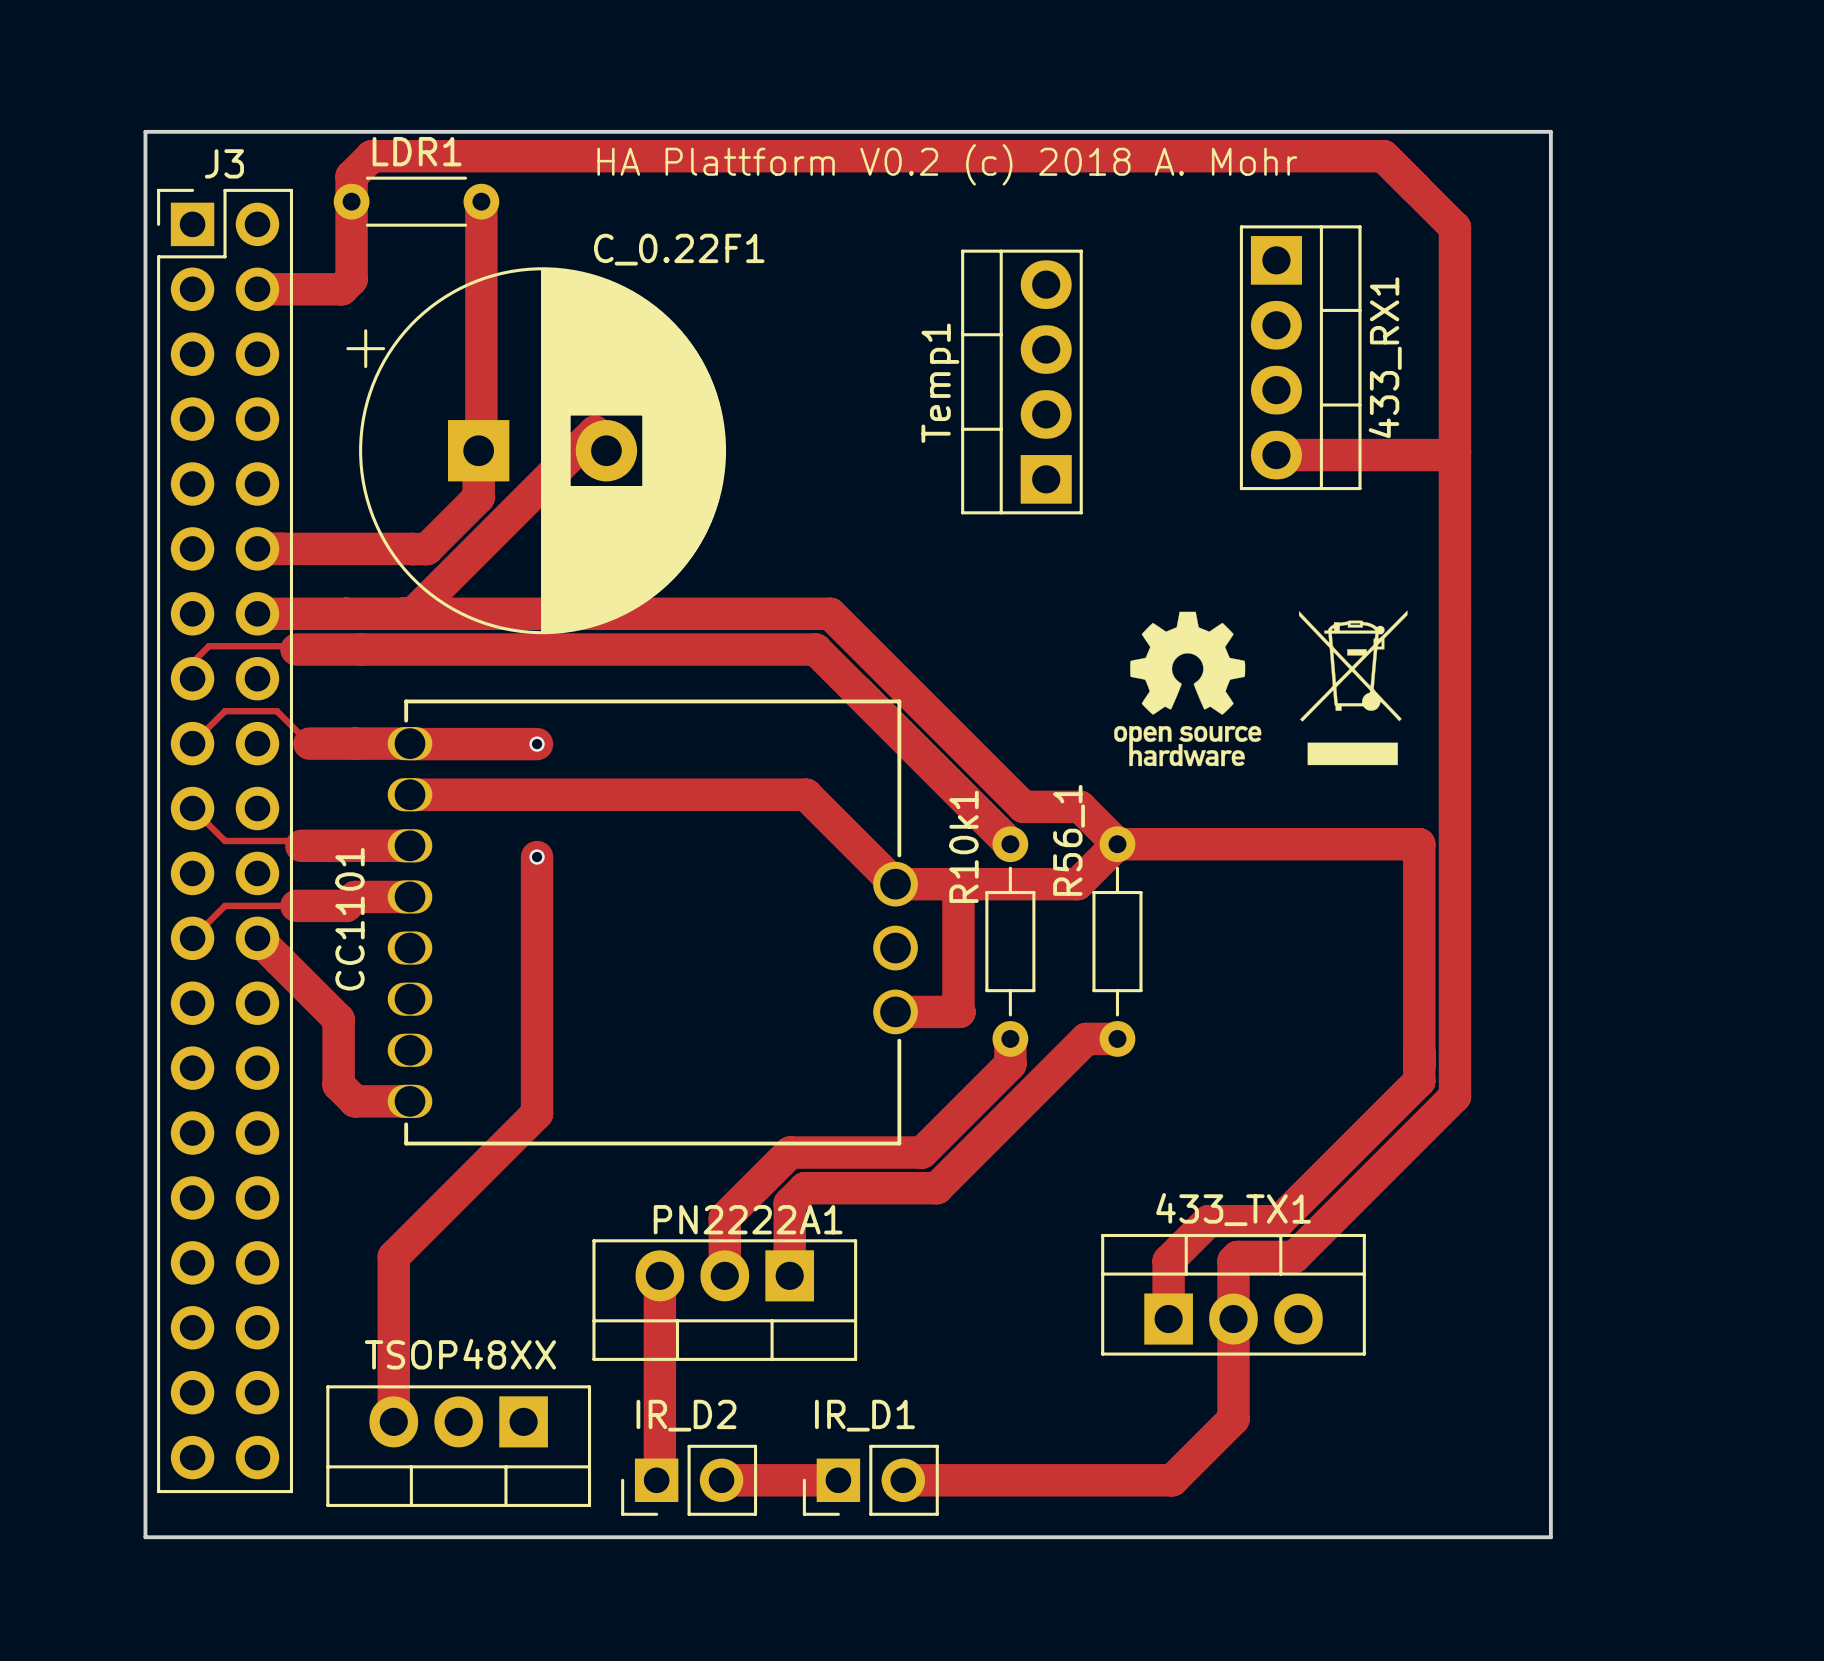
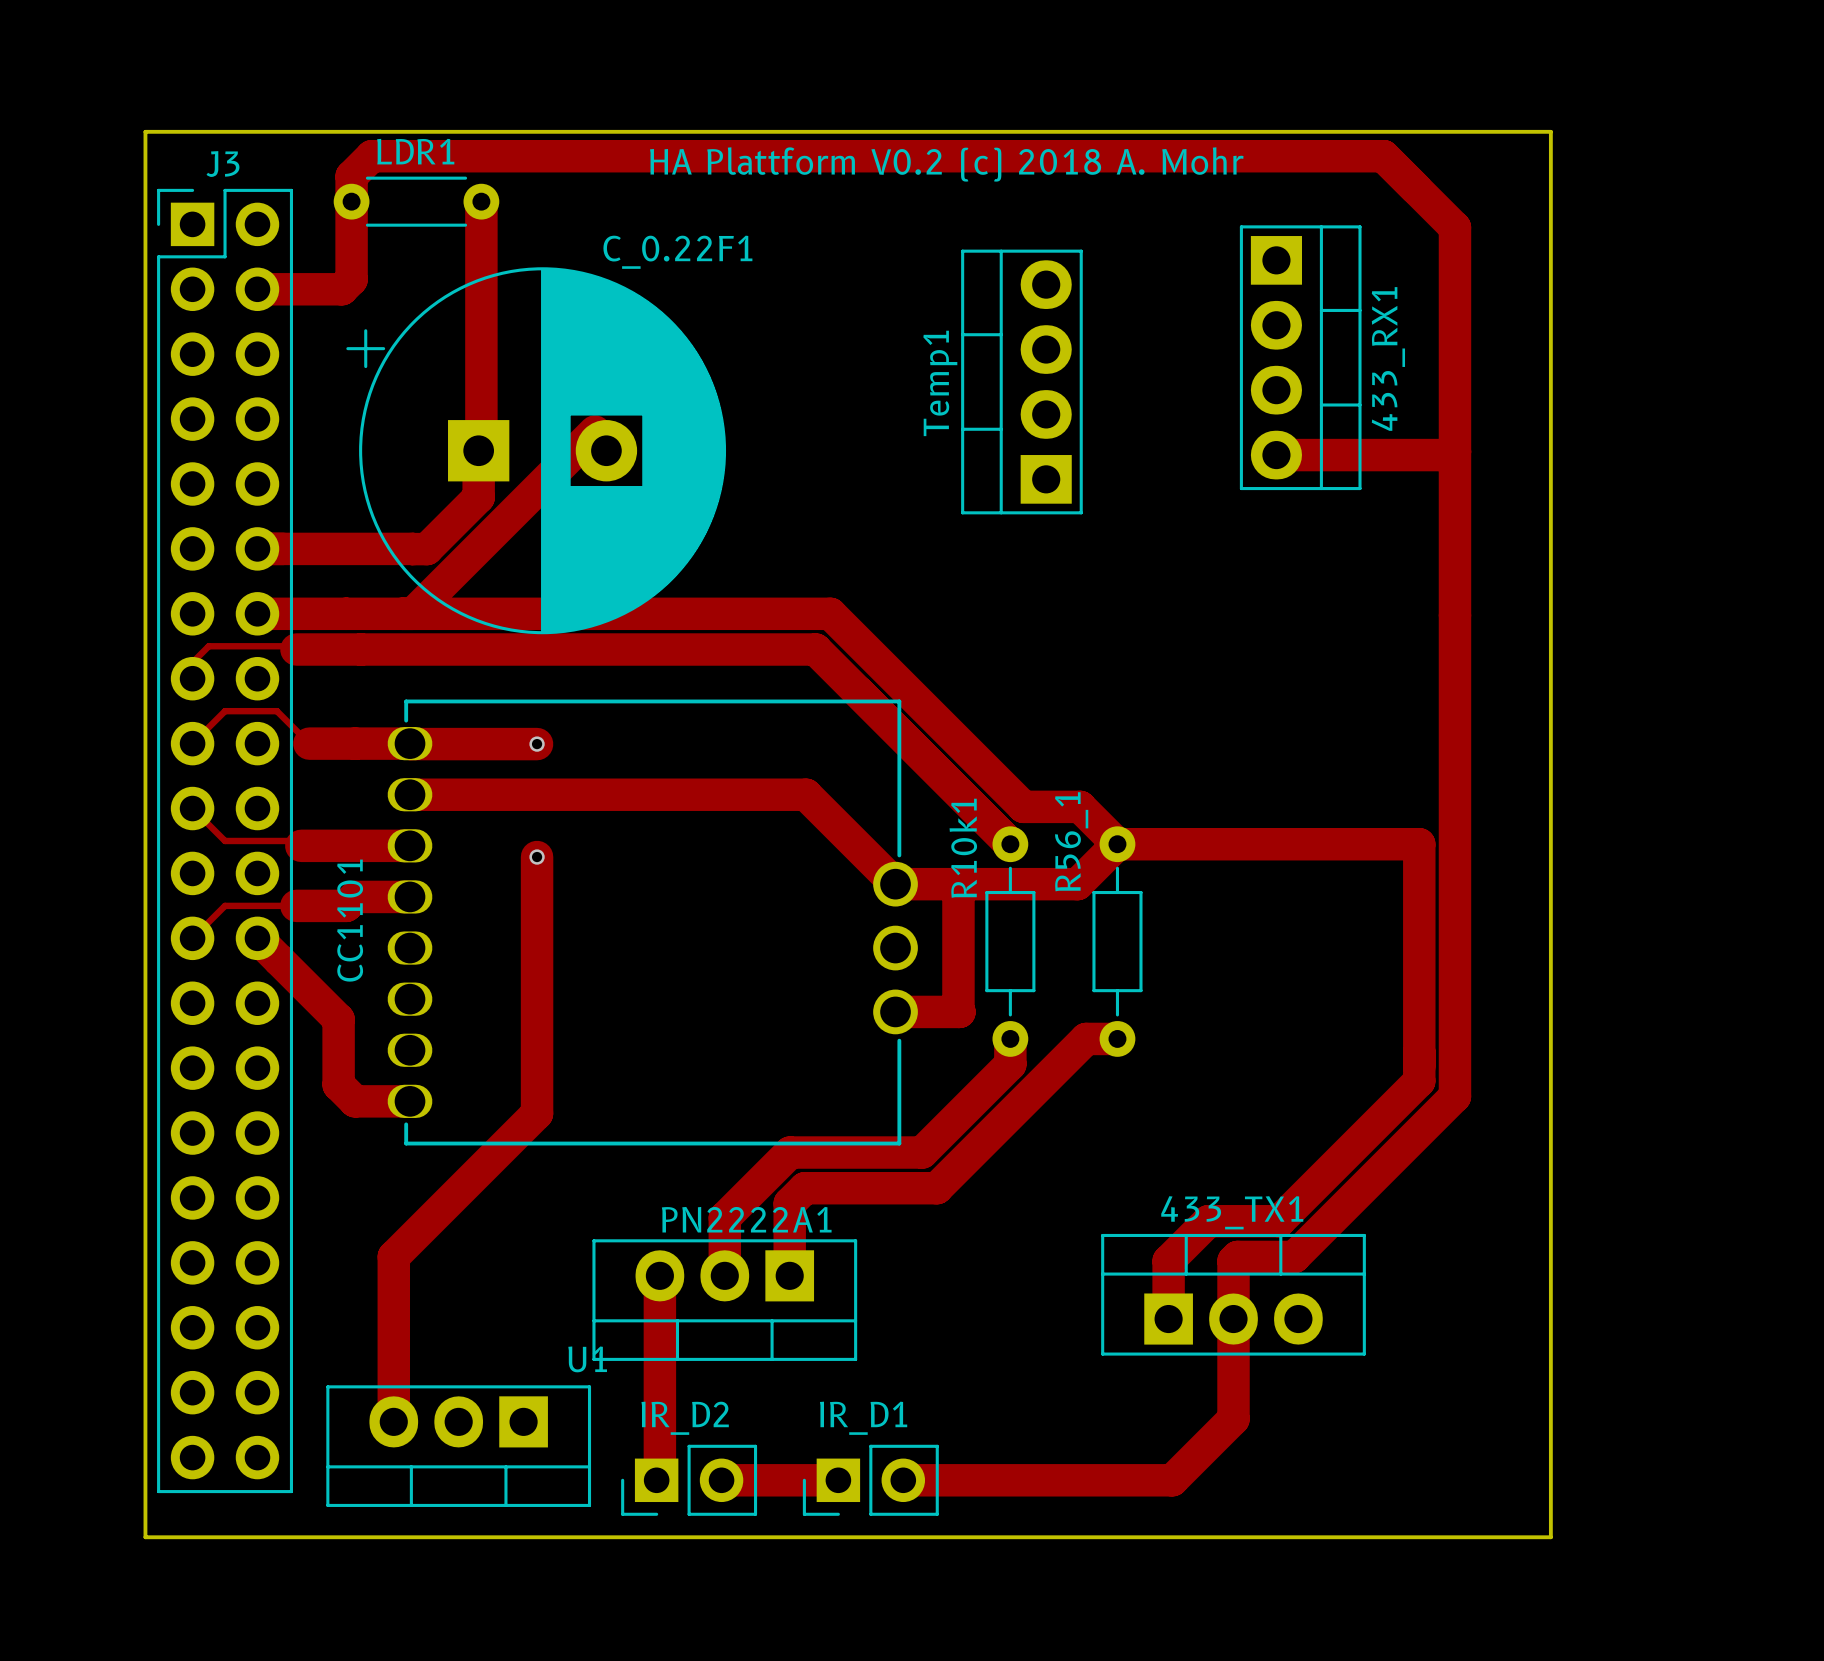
drawing: [1298, 610, 1408, 766] -> none
drawing: [1114, 611, 1262, 767] -> none
TSOP48XX name: TSOP48XX (460, 1354) -> U1 (587, 1359)

